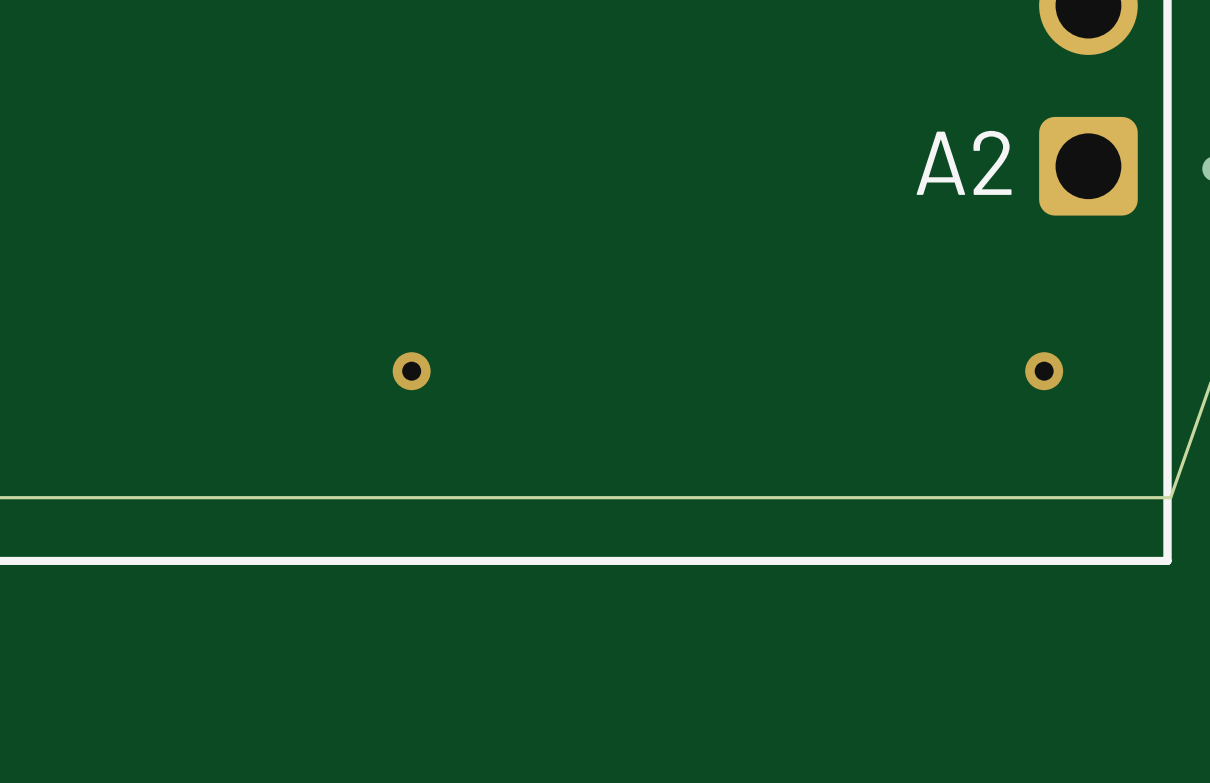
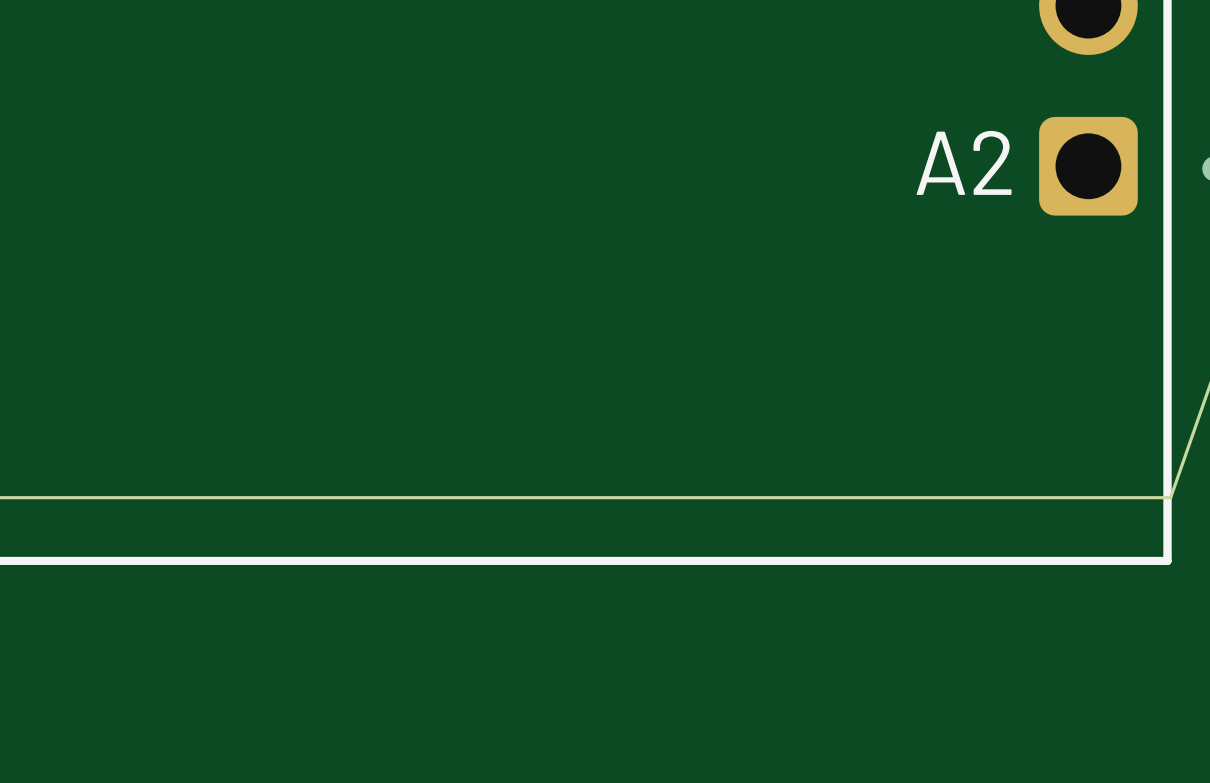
via: (411, 371) -> none
via: (1044, 371) -> none

